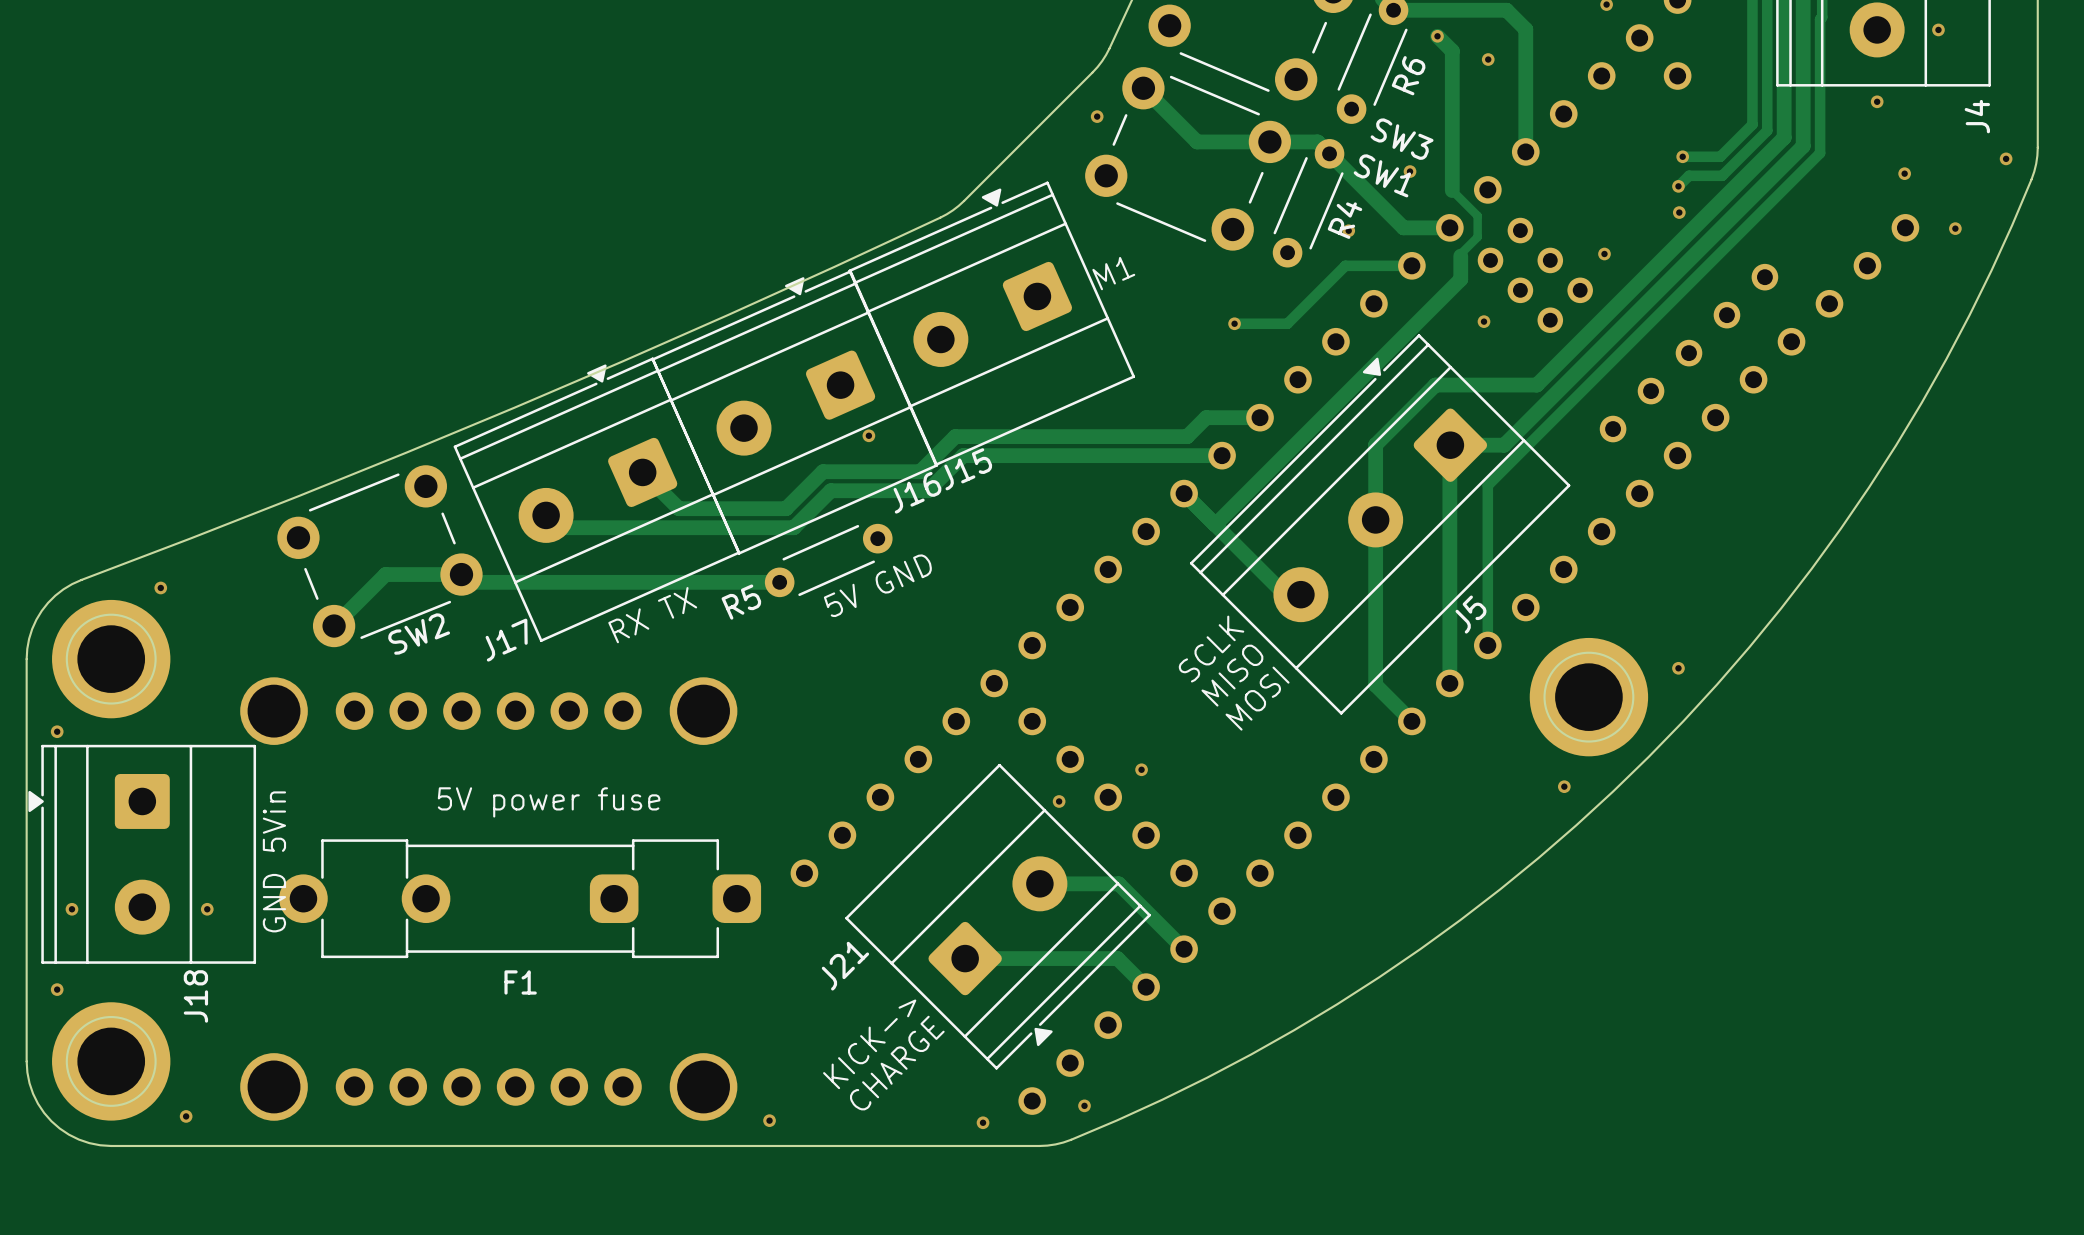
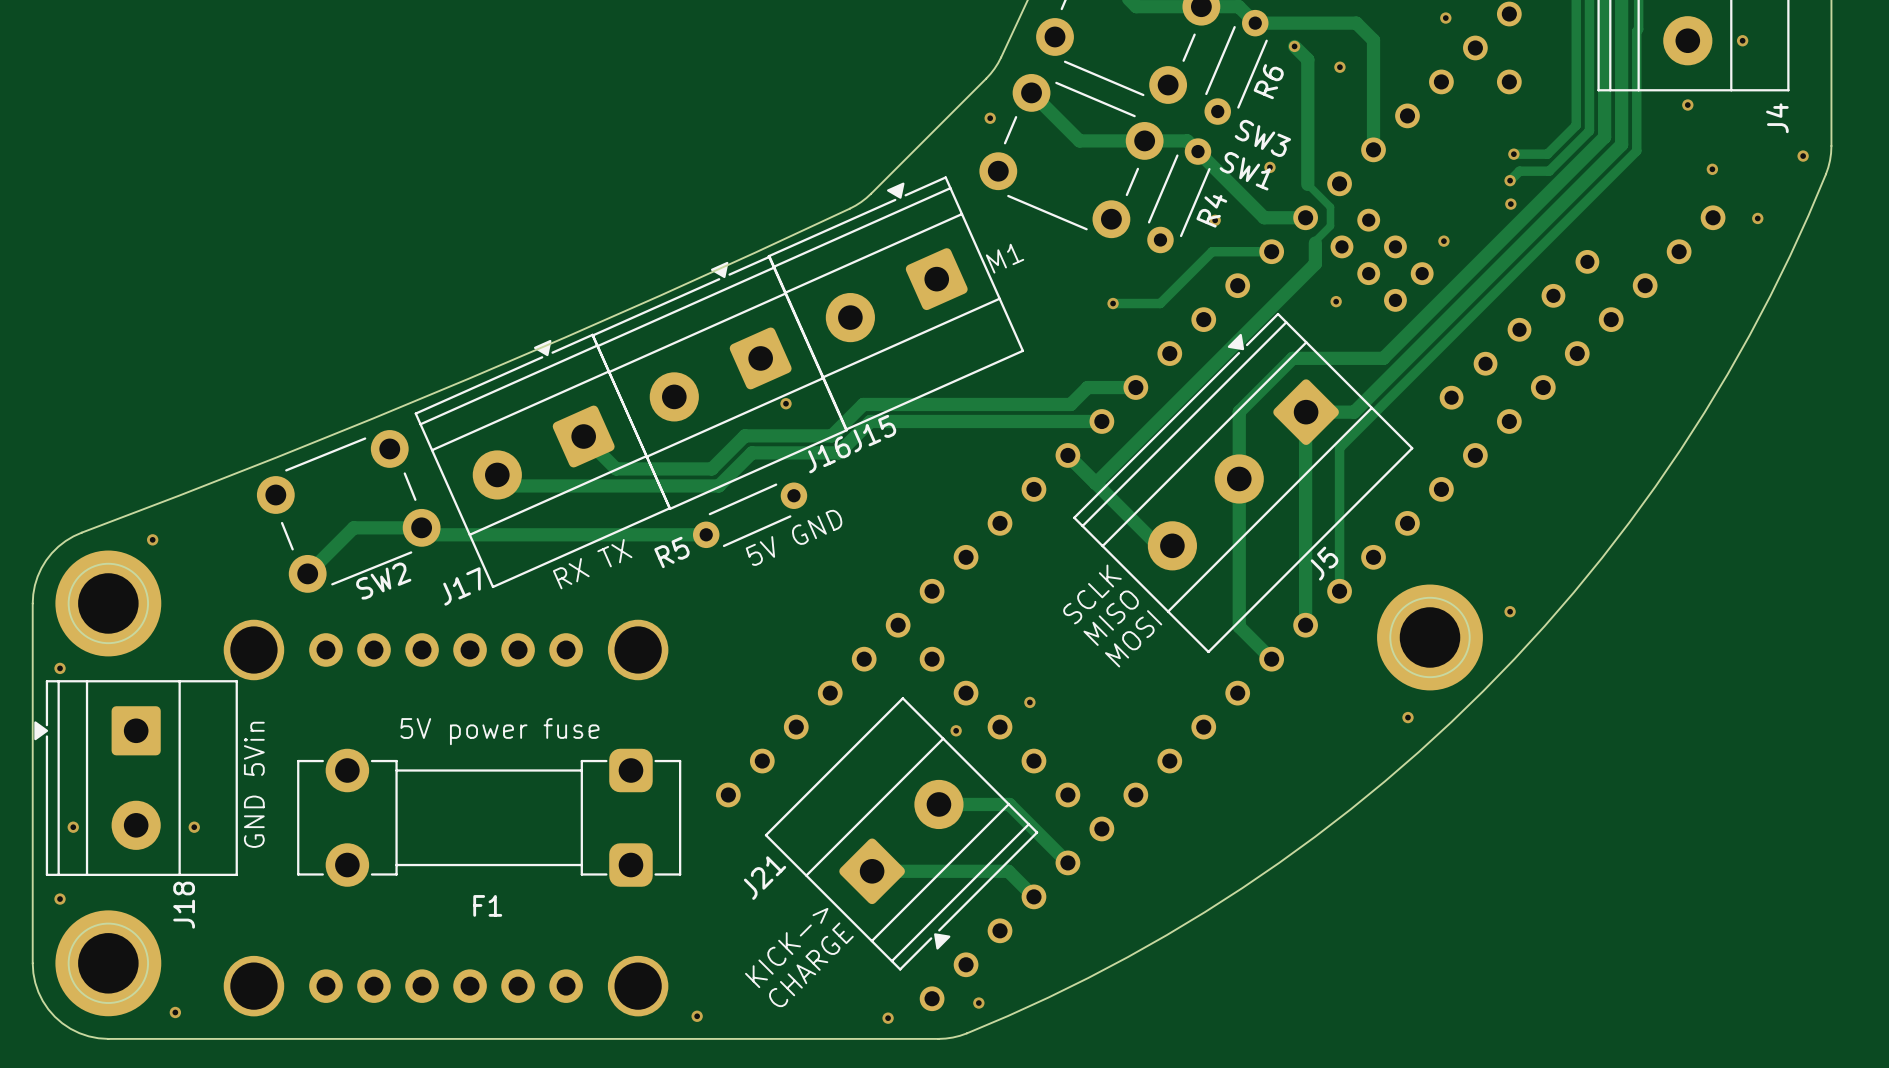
F1 footprint: [279, 839, 762, 959] -> [297, 748, 682, 887]

